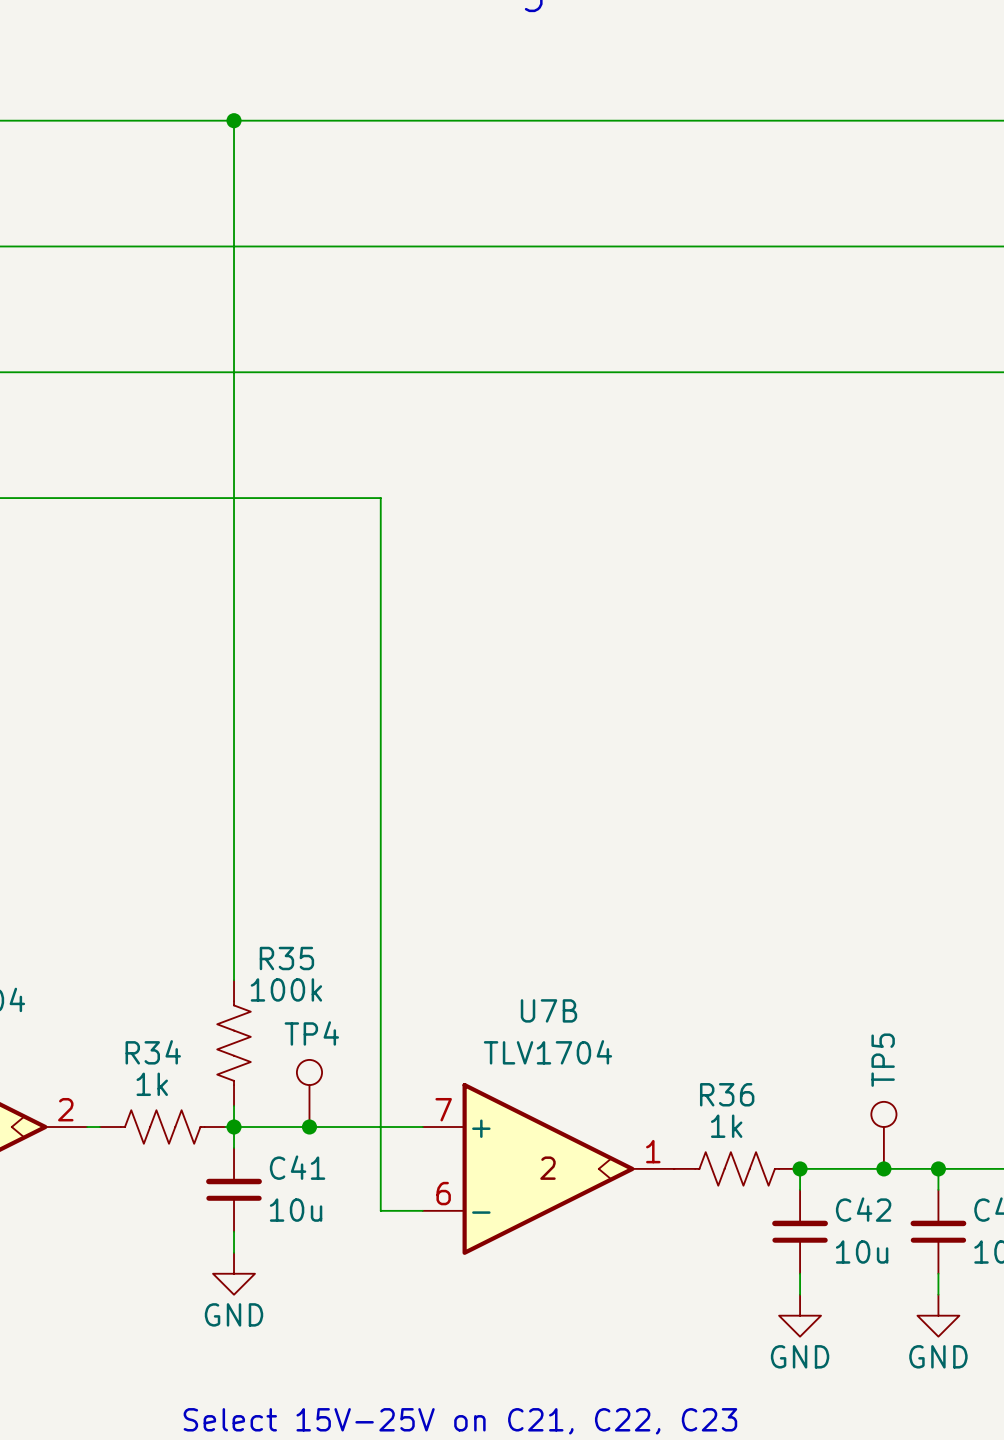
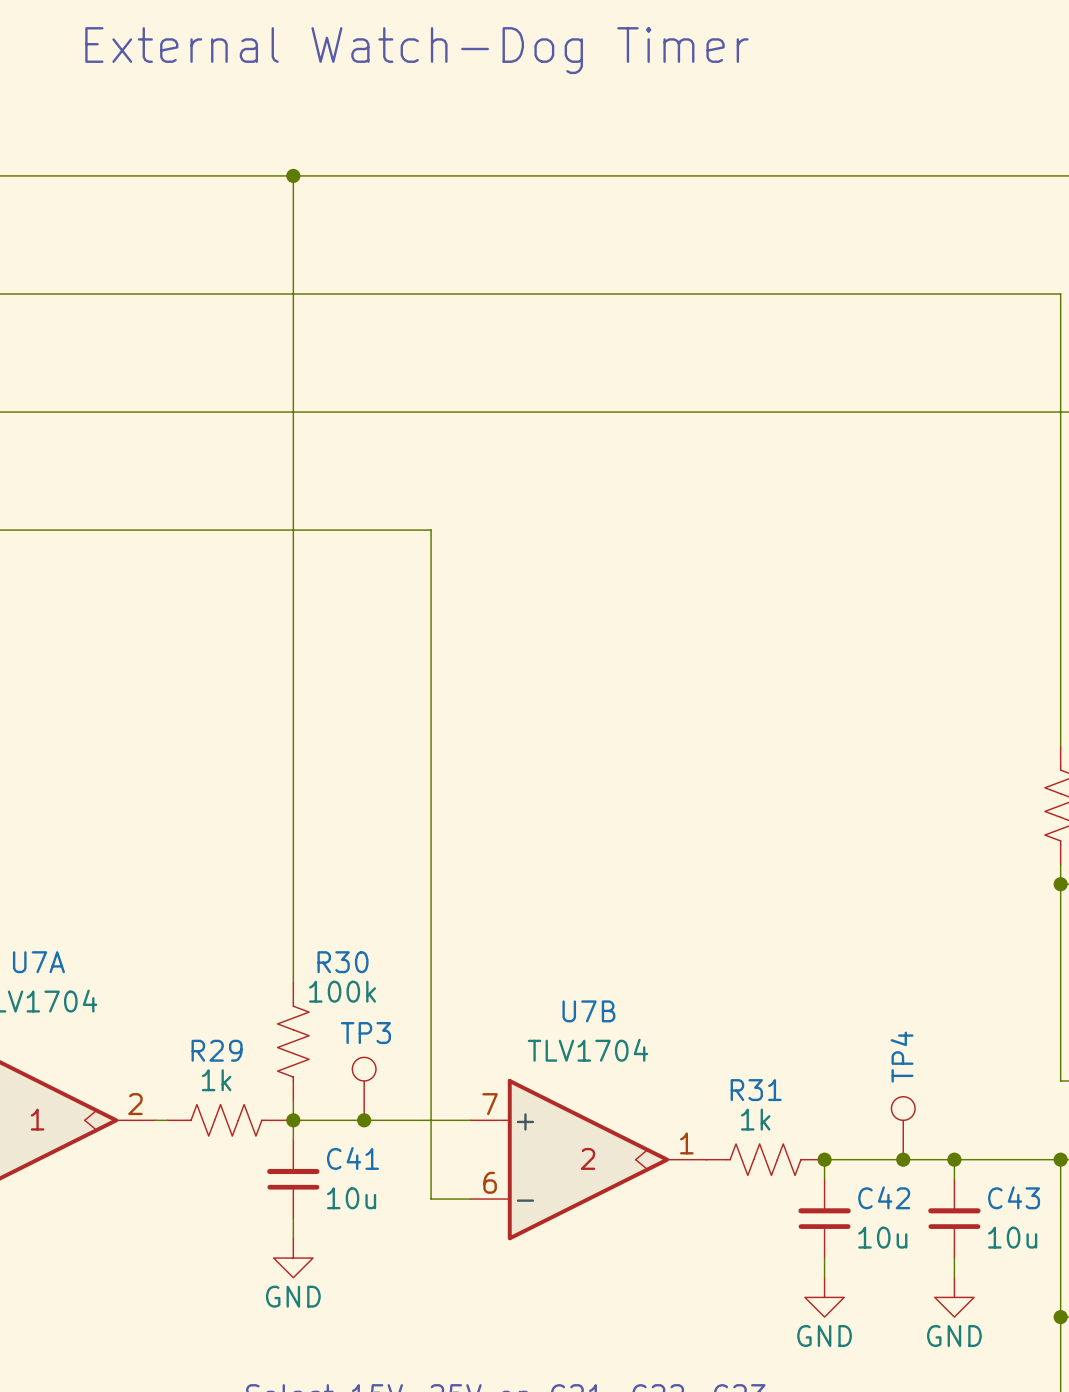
R35 name: R35 (286, 958) -> R30 (342, 962)
TP4 name: TP4 (311, 1033) -> TP3 (365, 1033)
R34 name: R34 (153, 1052) -> R29 (217, 1050)
TP5 name: TP5 (883, 1060) -> TP4 (902, 1057)
R36 name: R36 (727, 1094) -> R31 (756, 1090)

